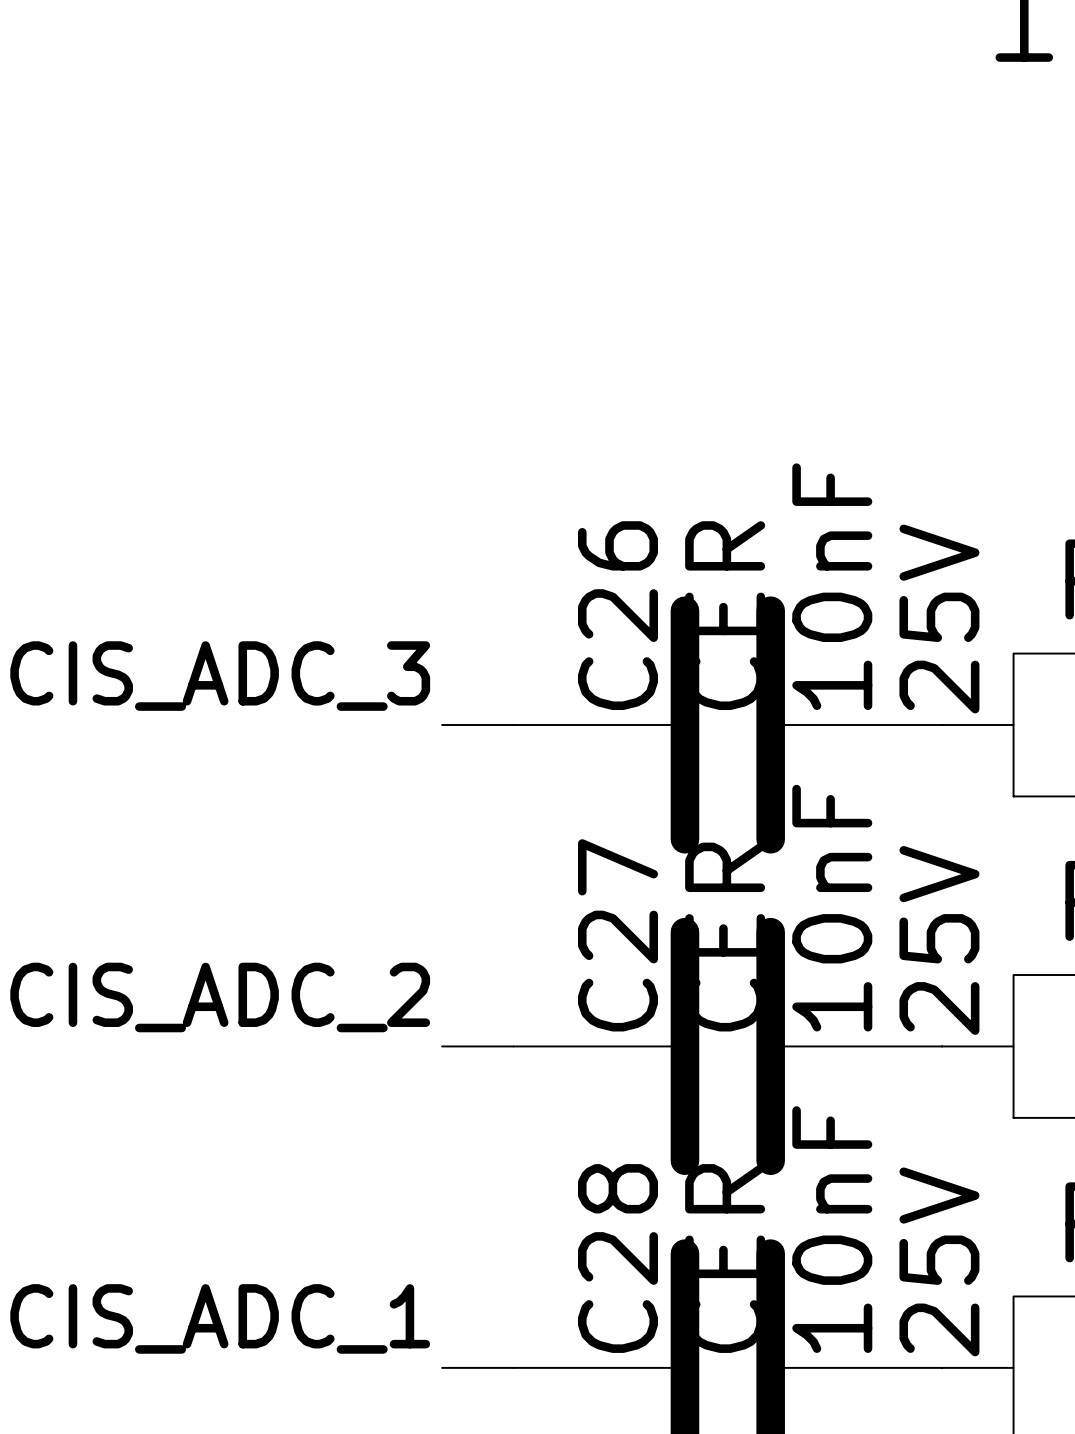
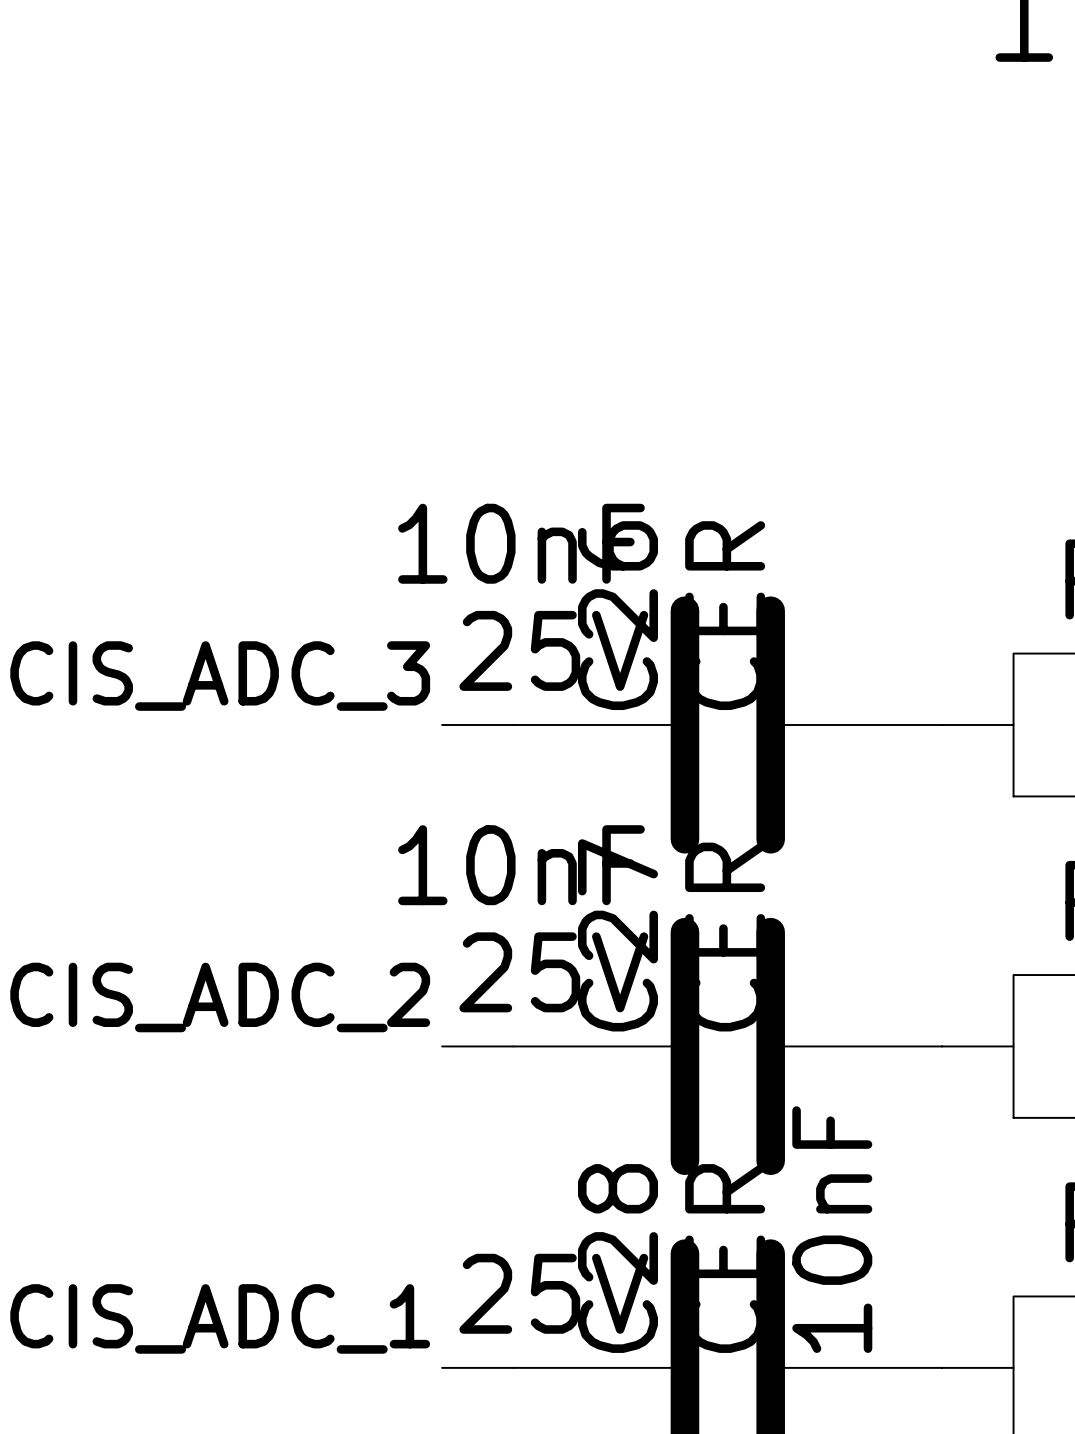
C26 text rotation: 0° (832, 586) -> 90° clockwise (521, 543)
C26 text position: 10nF (832, 586) -> 10nF (521, 543)
C26 text rotation: 0° (939, 619) -> 90° clockwise (553, 650)
C26 text position: 25V (939, 619) -> 25V (553, 650)
C27 text rotation: 0° (832, 908) -> 90° clockwise (521, 865)
C27 text position: 10nF (832, 908) -> 10nF (521, 865)
C27 text rotation: 0° (939, 940) -> 90° clockwise (553, 972)
C27 text position: 25V (939, 940) -> 25V (553, 972)
C28 text rotation: 0° (939, 1261) -> 90° clockwise (553, 1293)
C28 text position: 25V (939, 1261) -> 25V (553, 1293)

